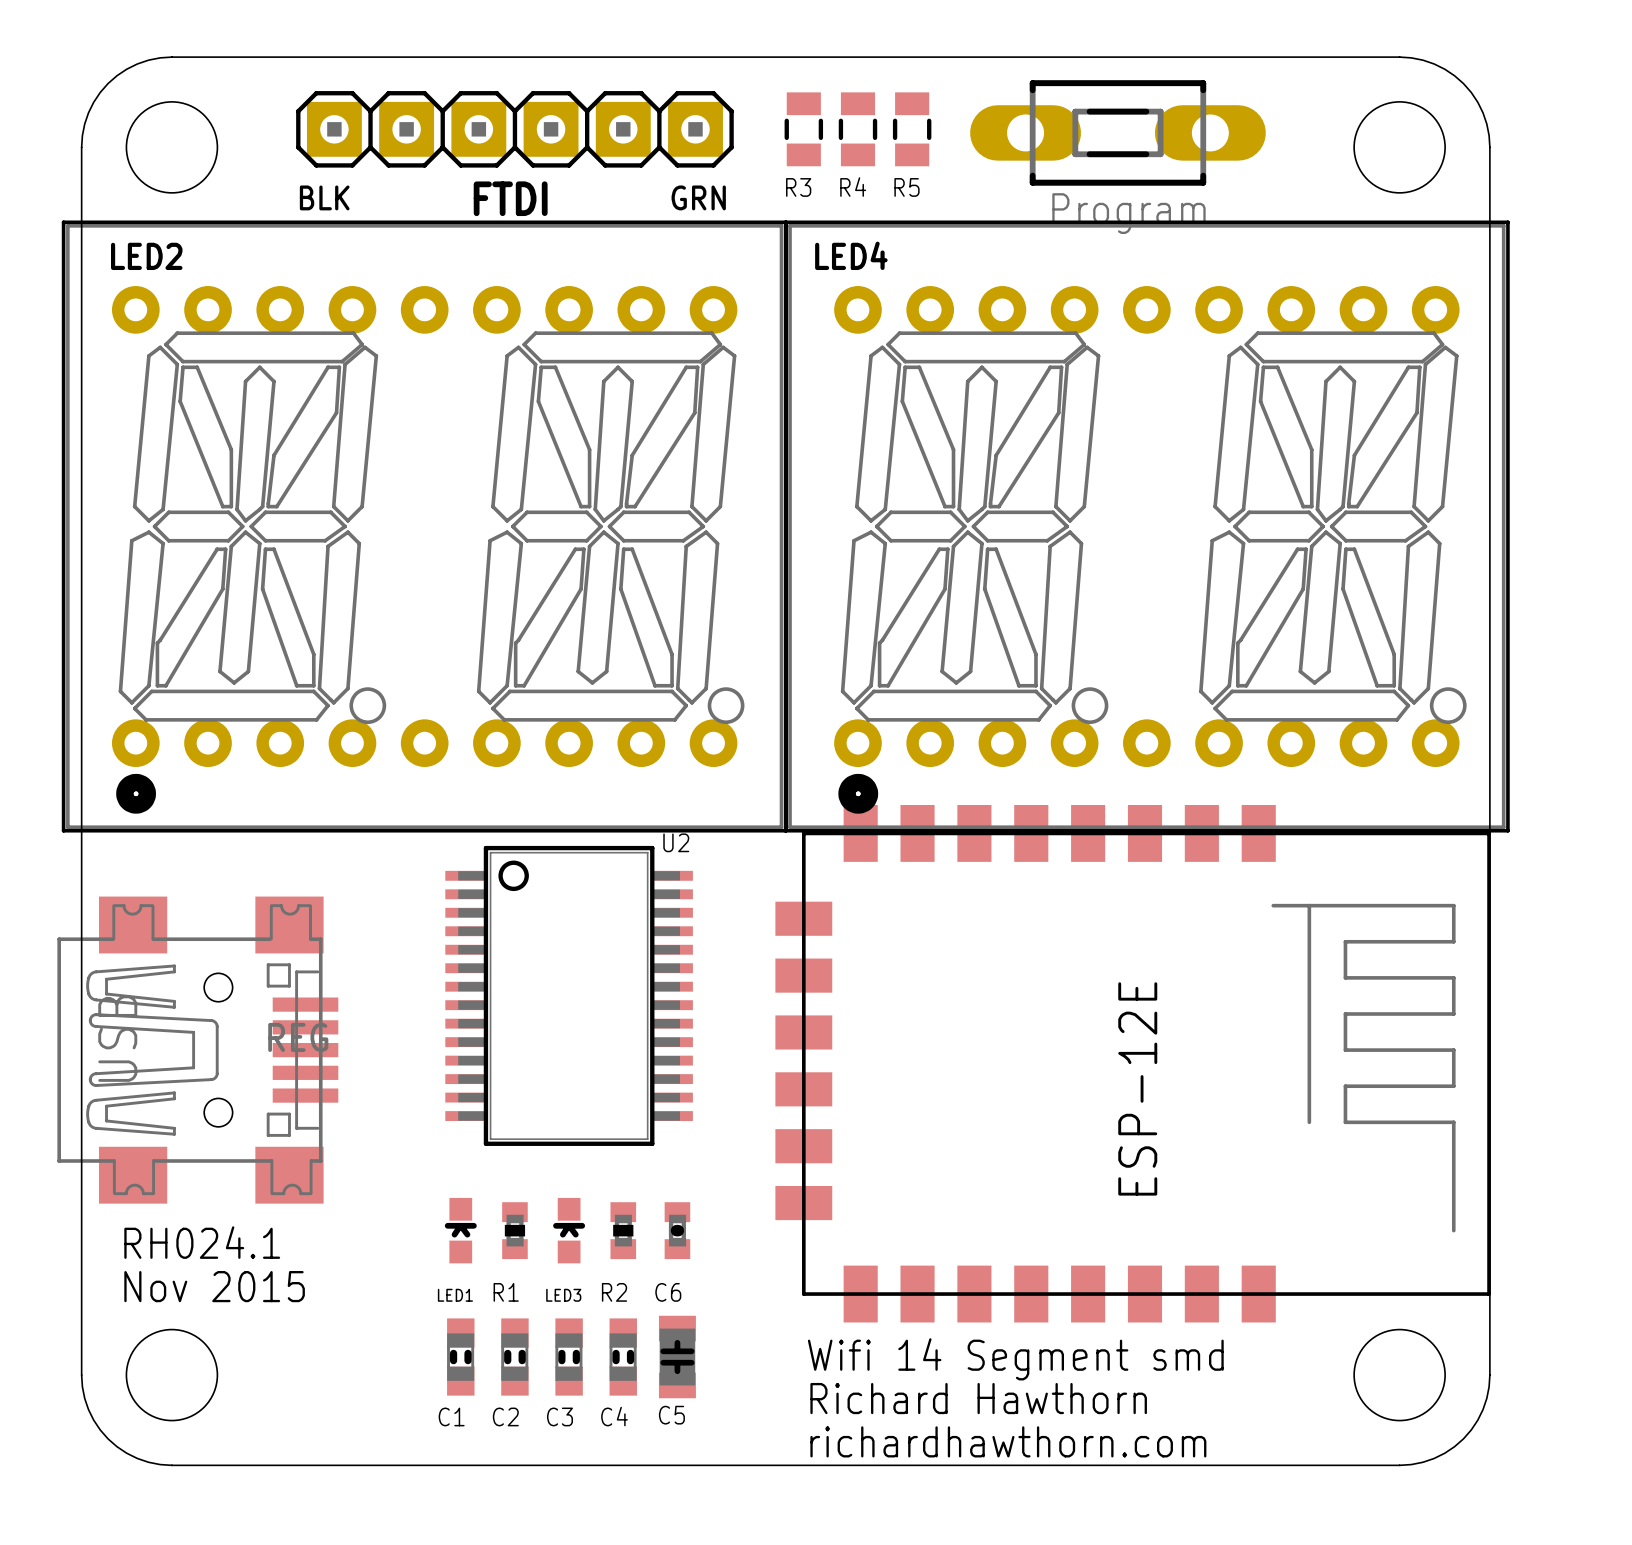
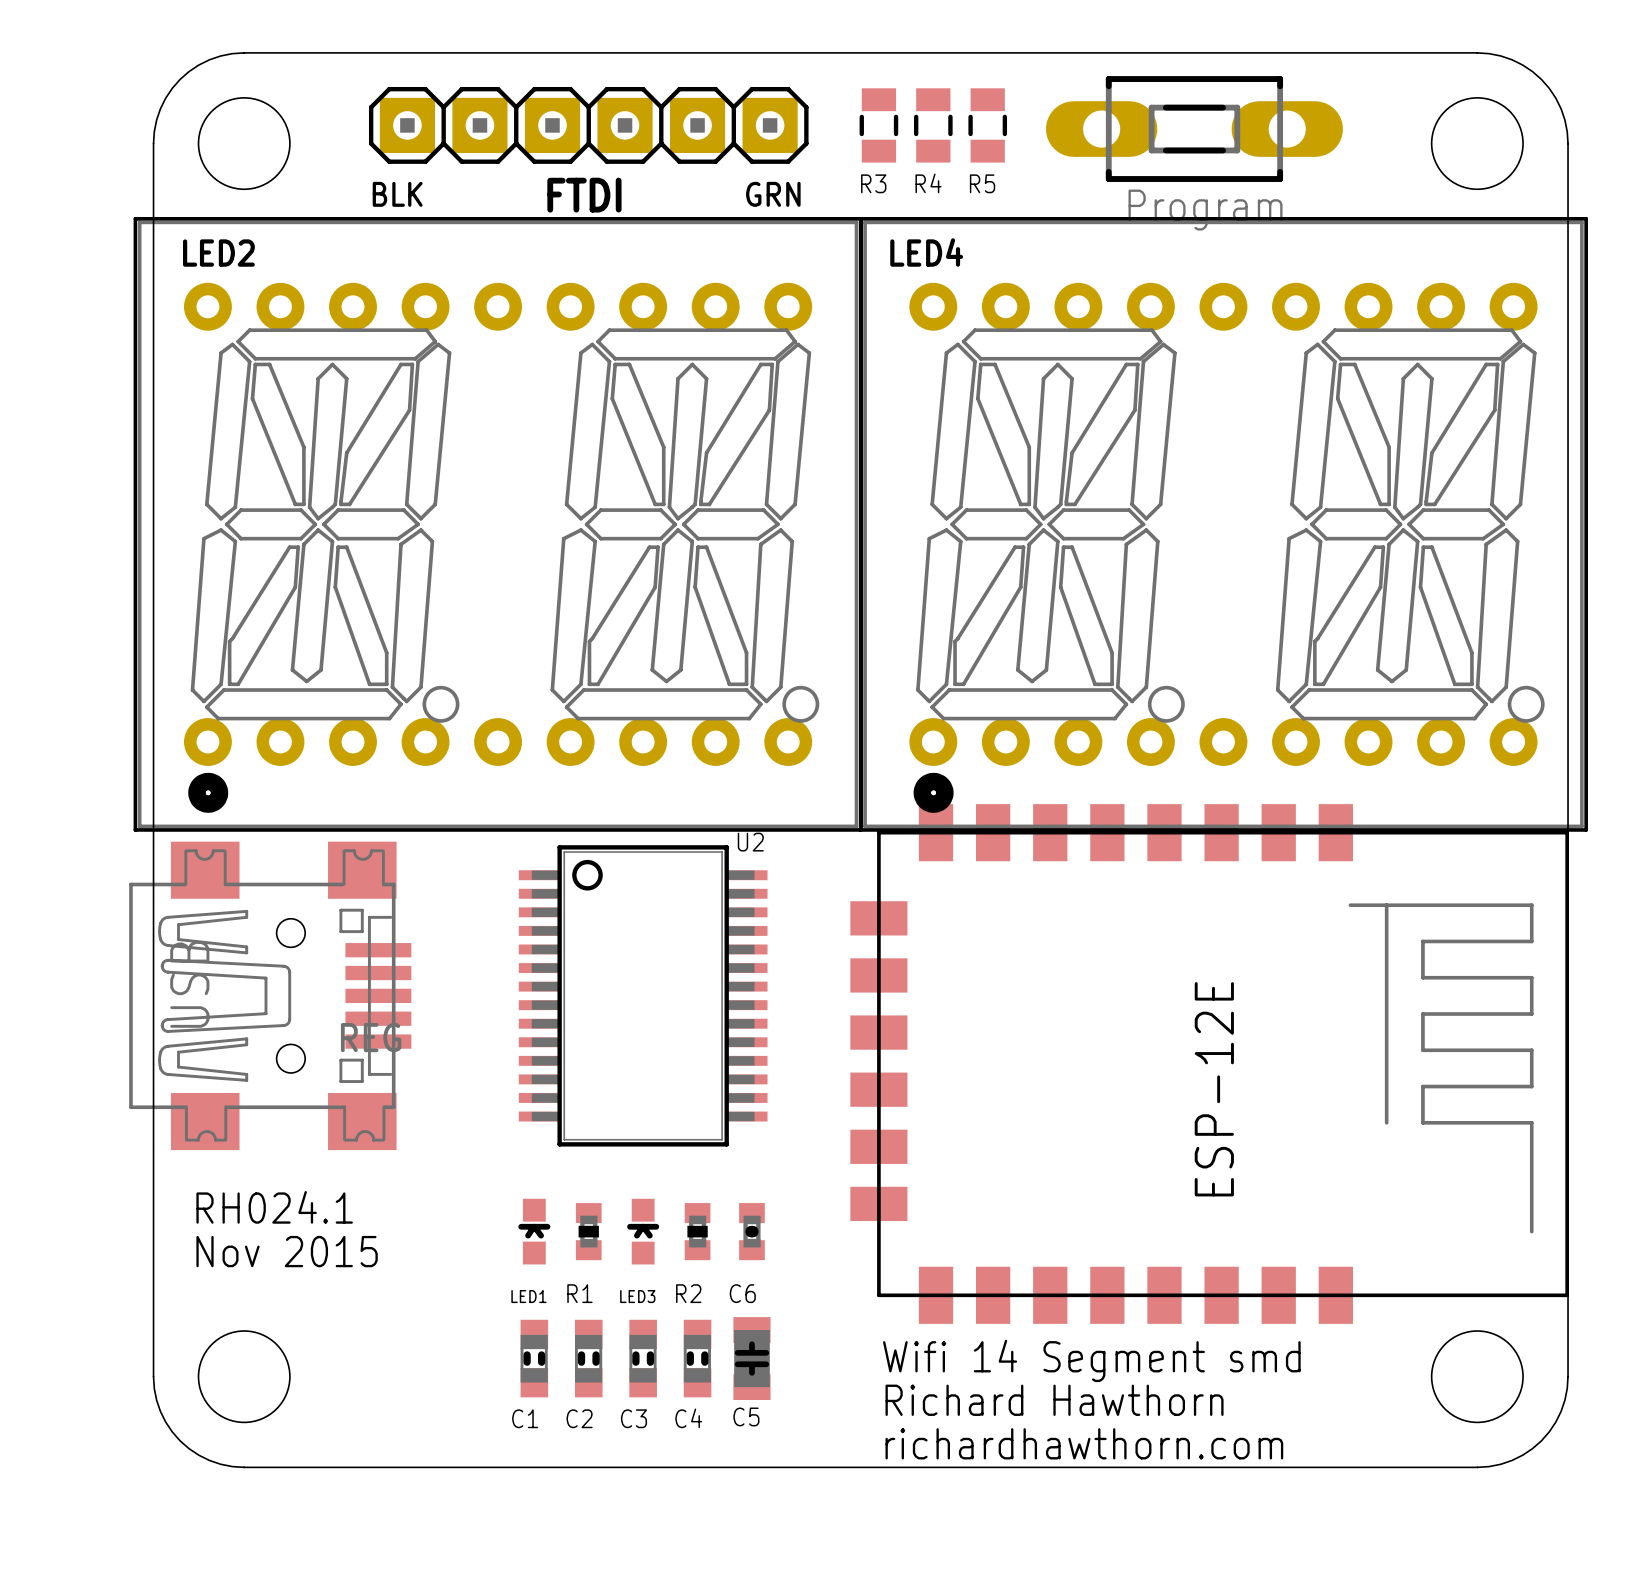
part position: (197, 1050) -> (270, 995)
text: none -> RH024.1 (274, 1207)
text: RH024.1 (202, 1242) -> Nov 2015 (287, 1251)
text: Nov 2015 (214, 1286) -> none

